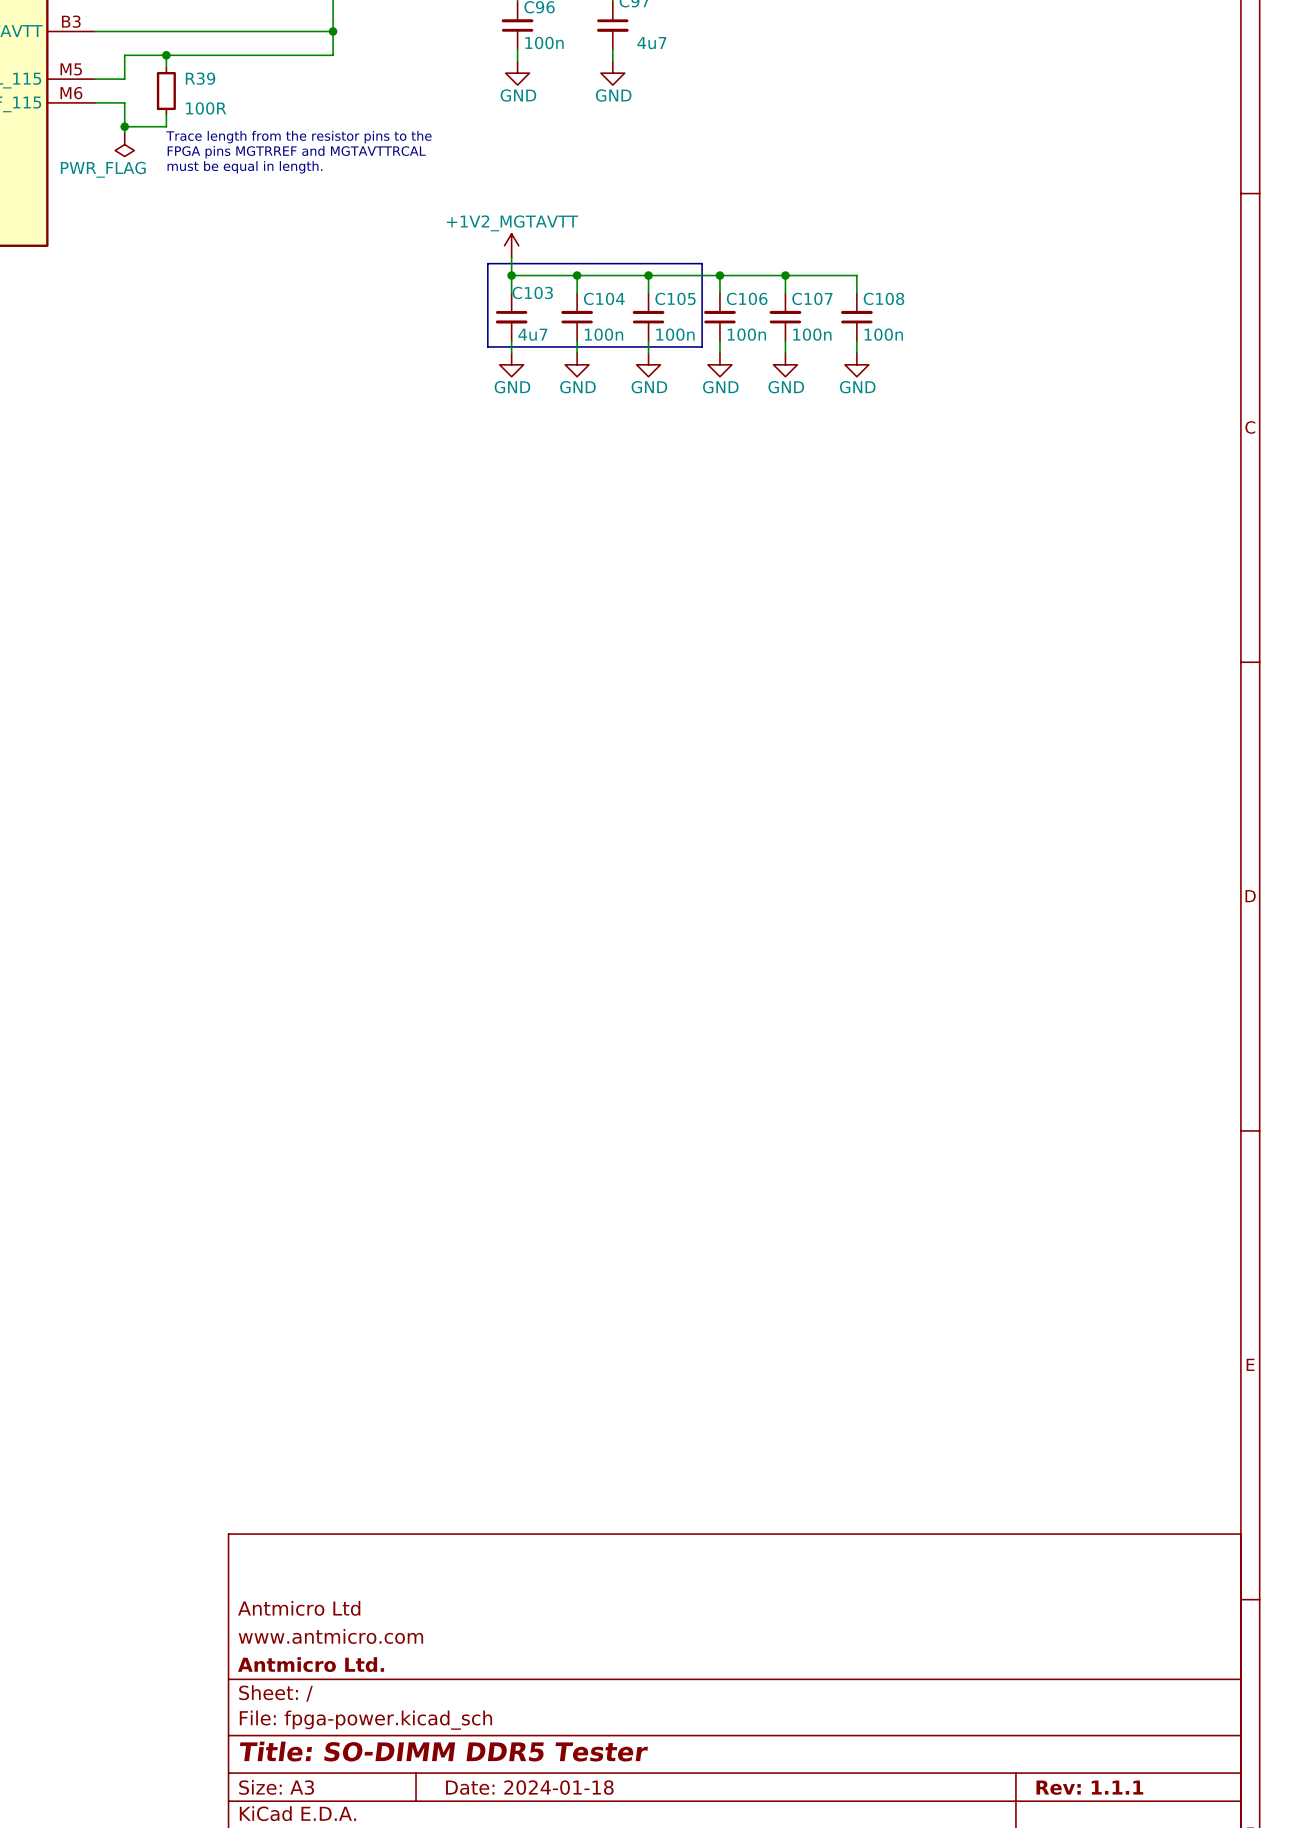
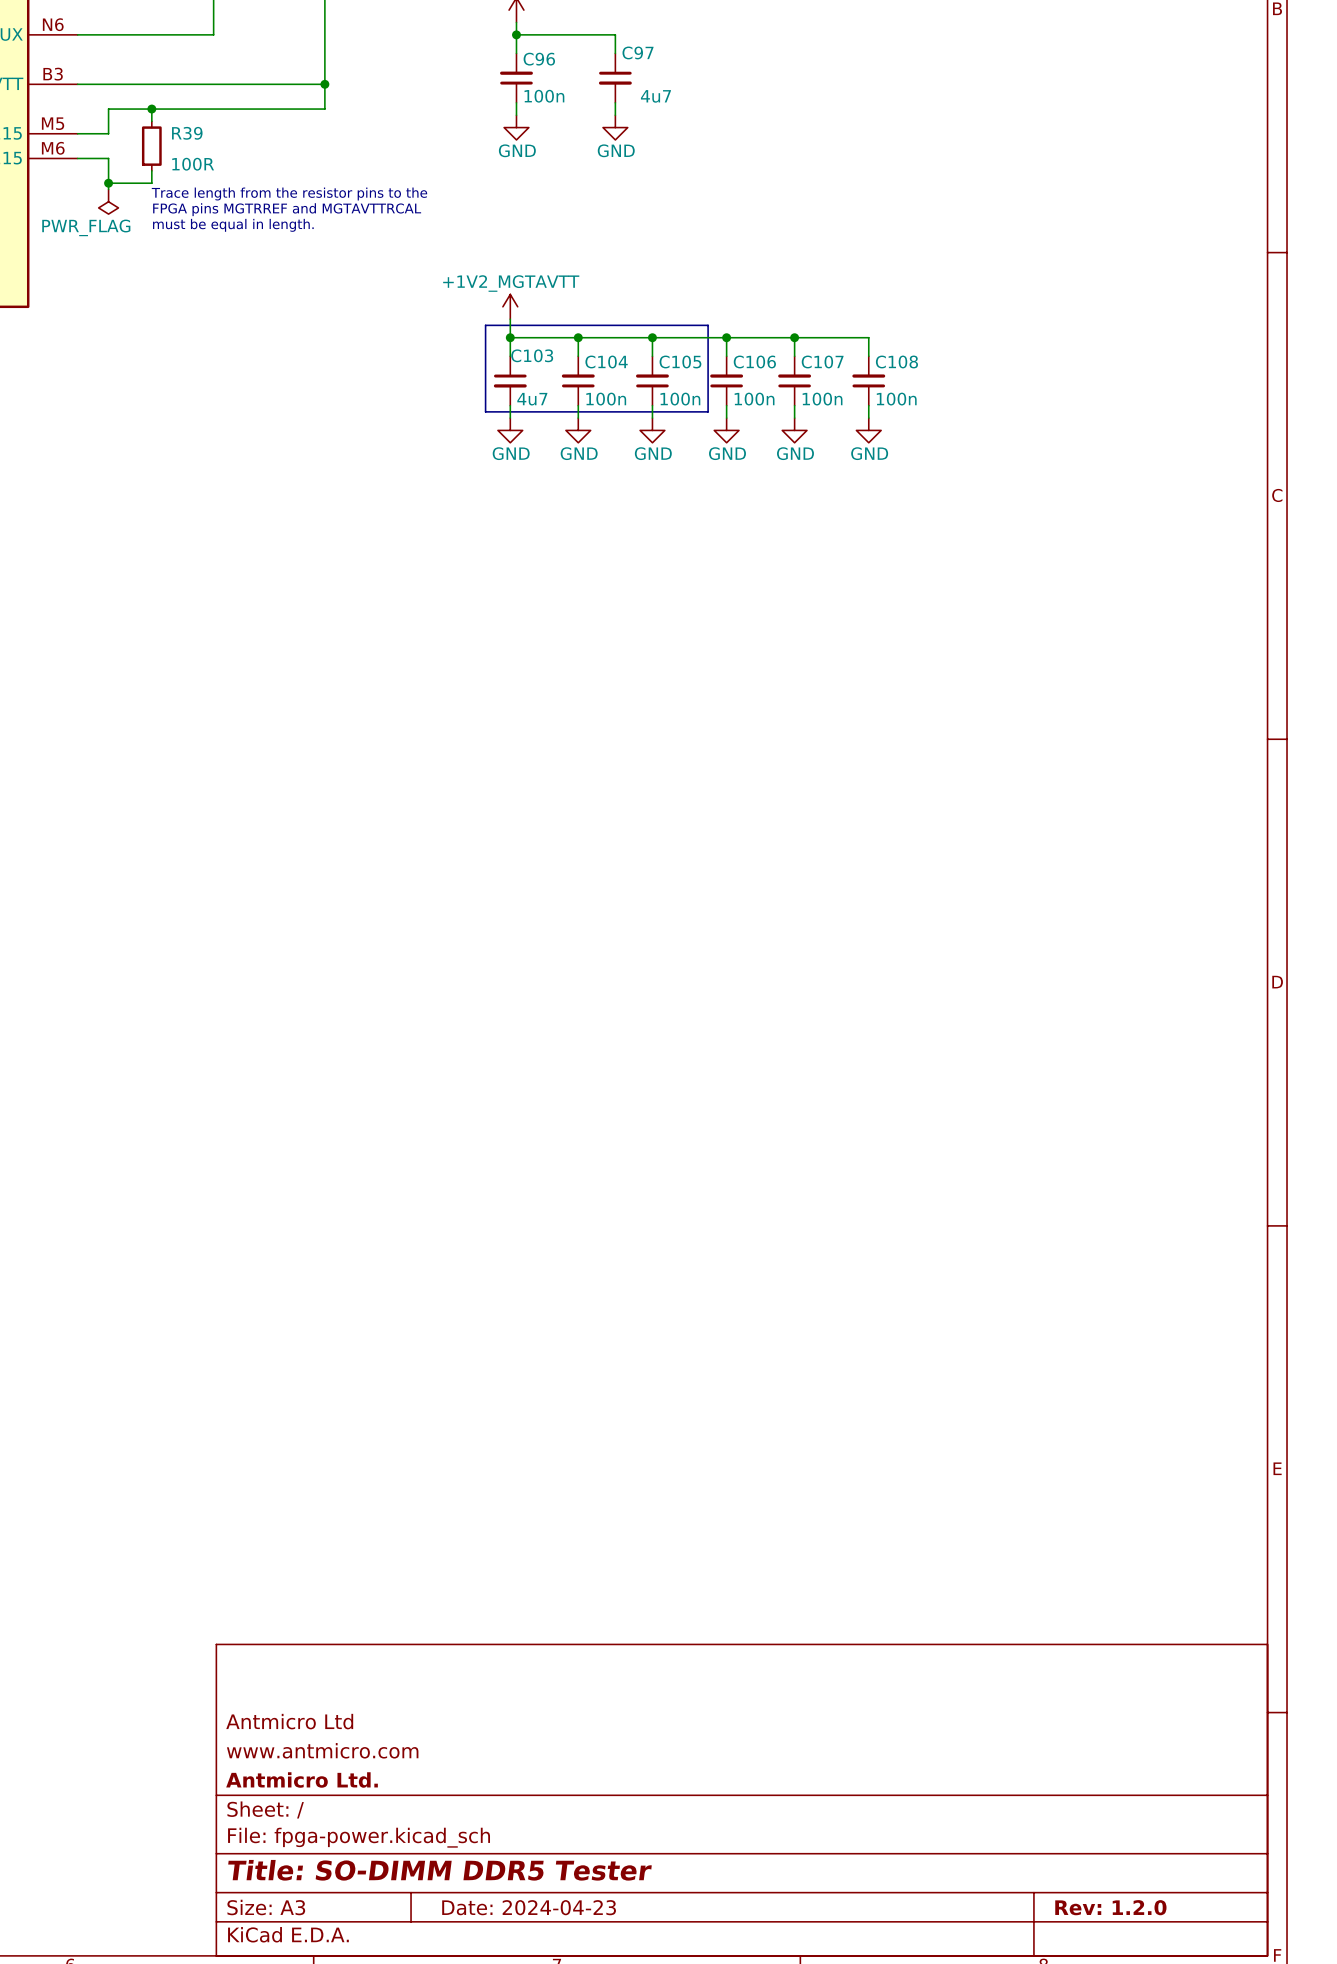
title block: Date: 2024-01-18 (529, 1787) -> Date: 2024-04-23 (529, 1907)
title block: Rev: 1.1.1 (1089, 1787) -> Rev: 1.2.0 (1110, 1907)

